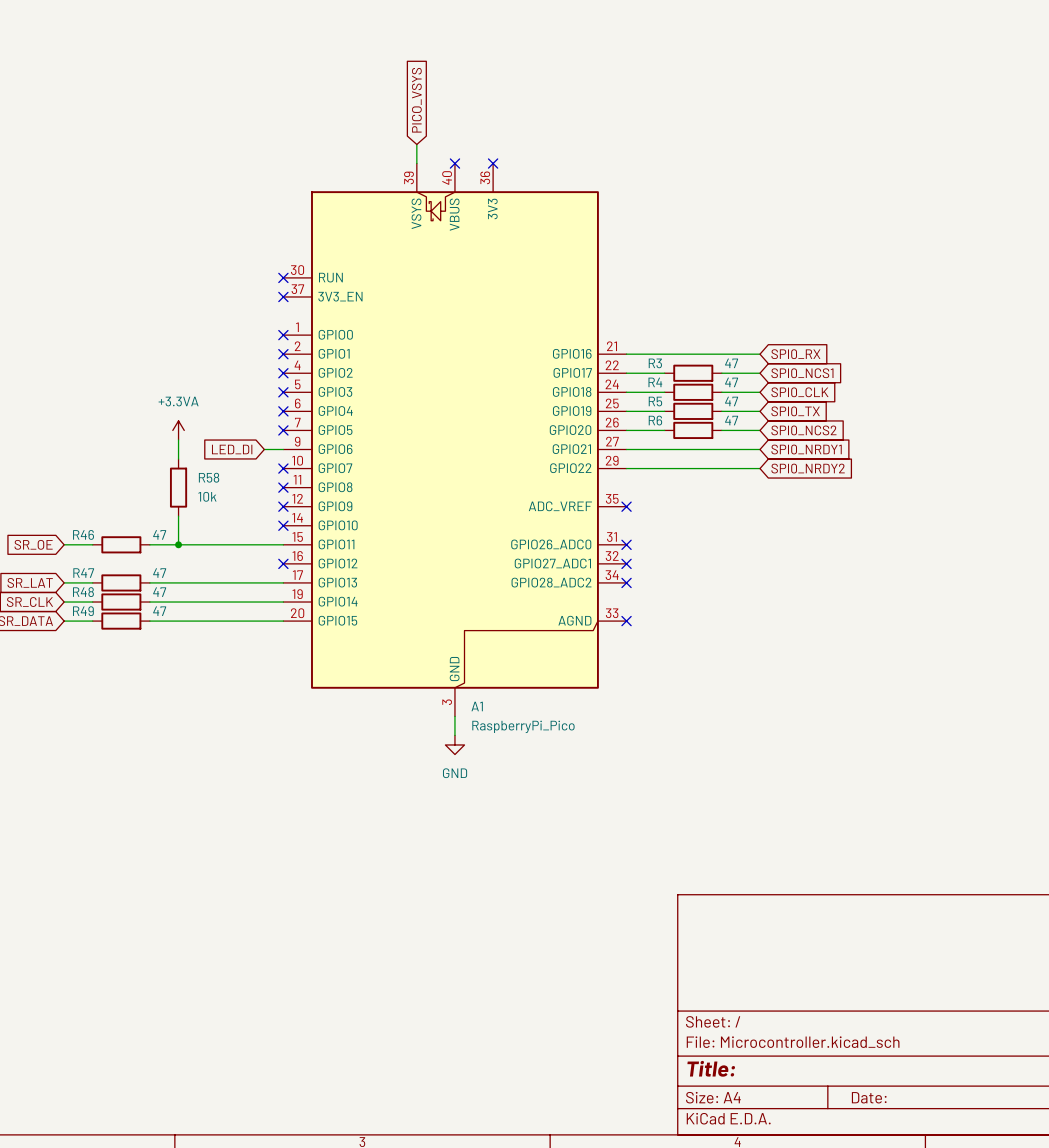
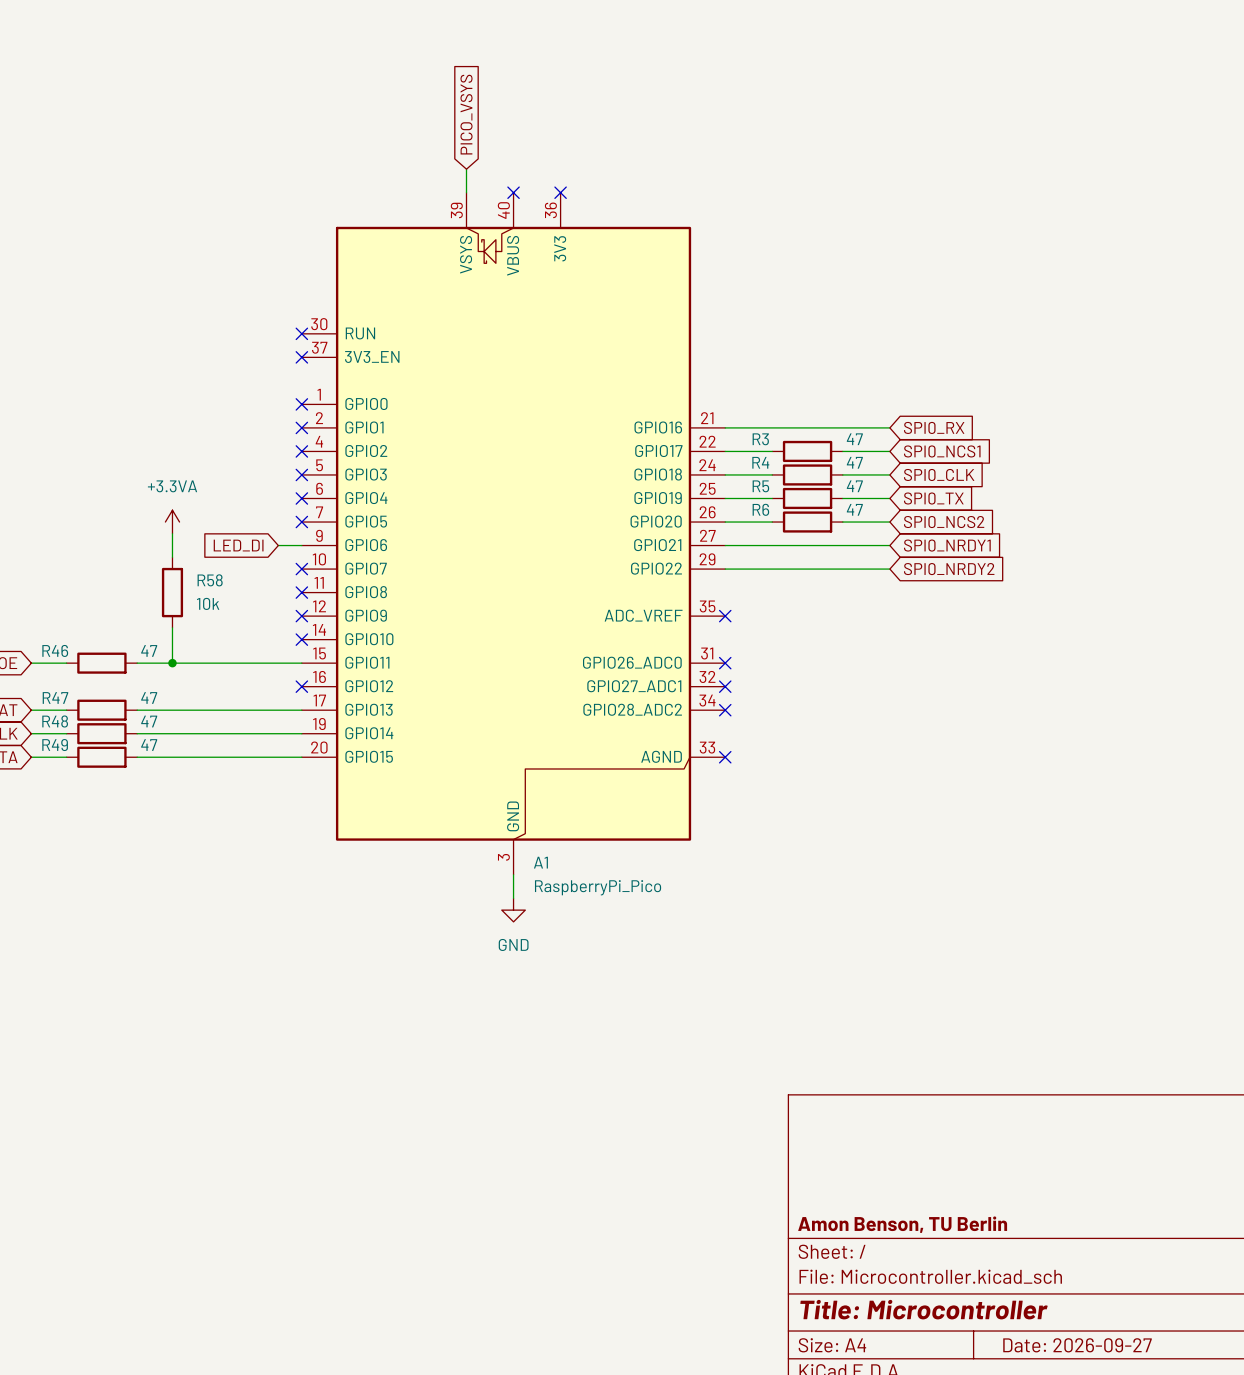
title block: none -> Amon Benson, TU Berlin (902, 1224)
title block: Title: (711, 1068) -> Title: Microcontroller (924, 1309)
title block: Date: (869, 1097) -> Date: 2026-09-27 (1077, 1345)

